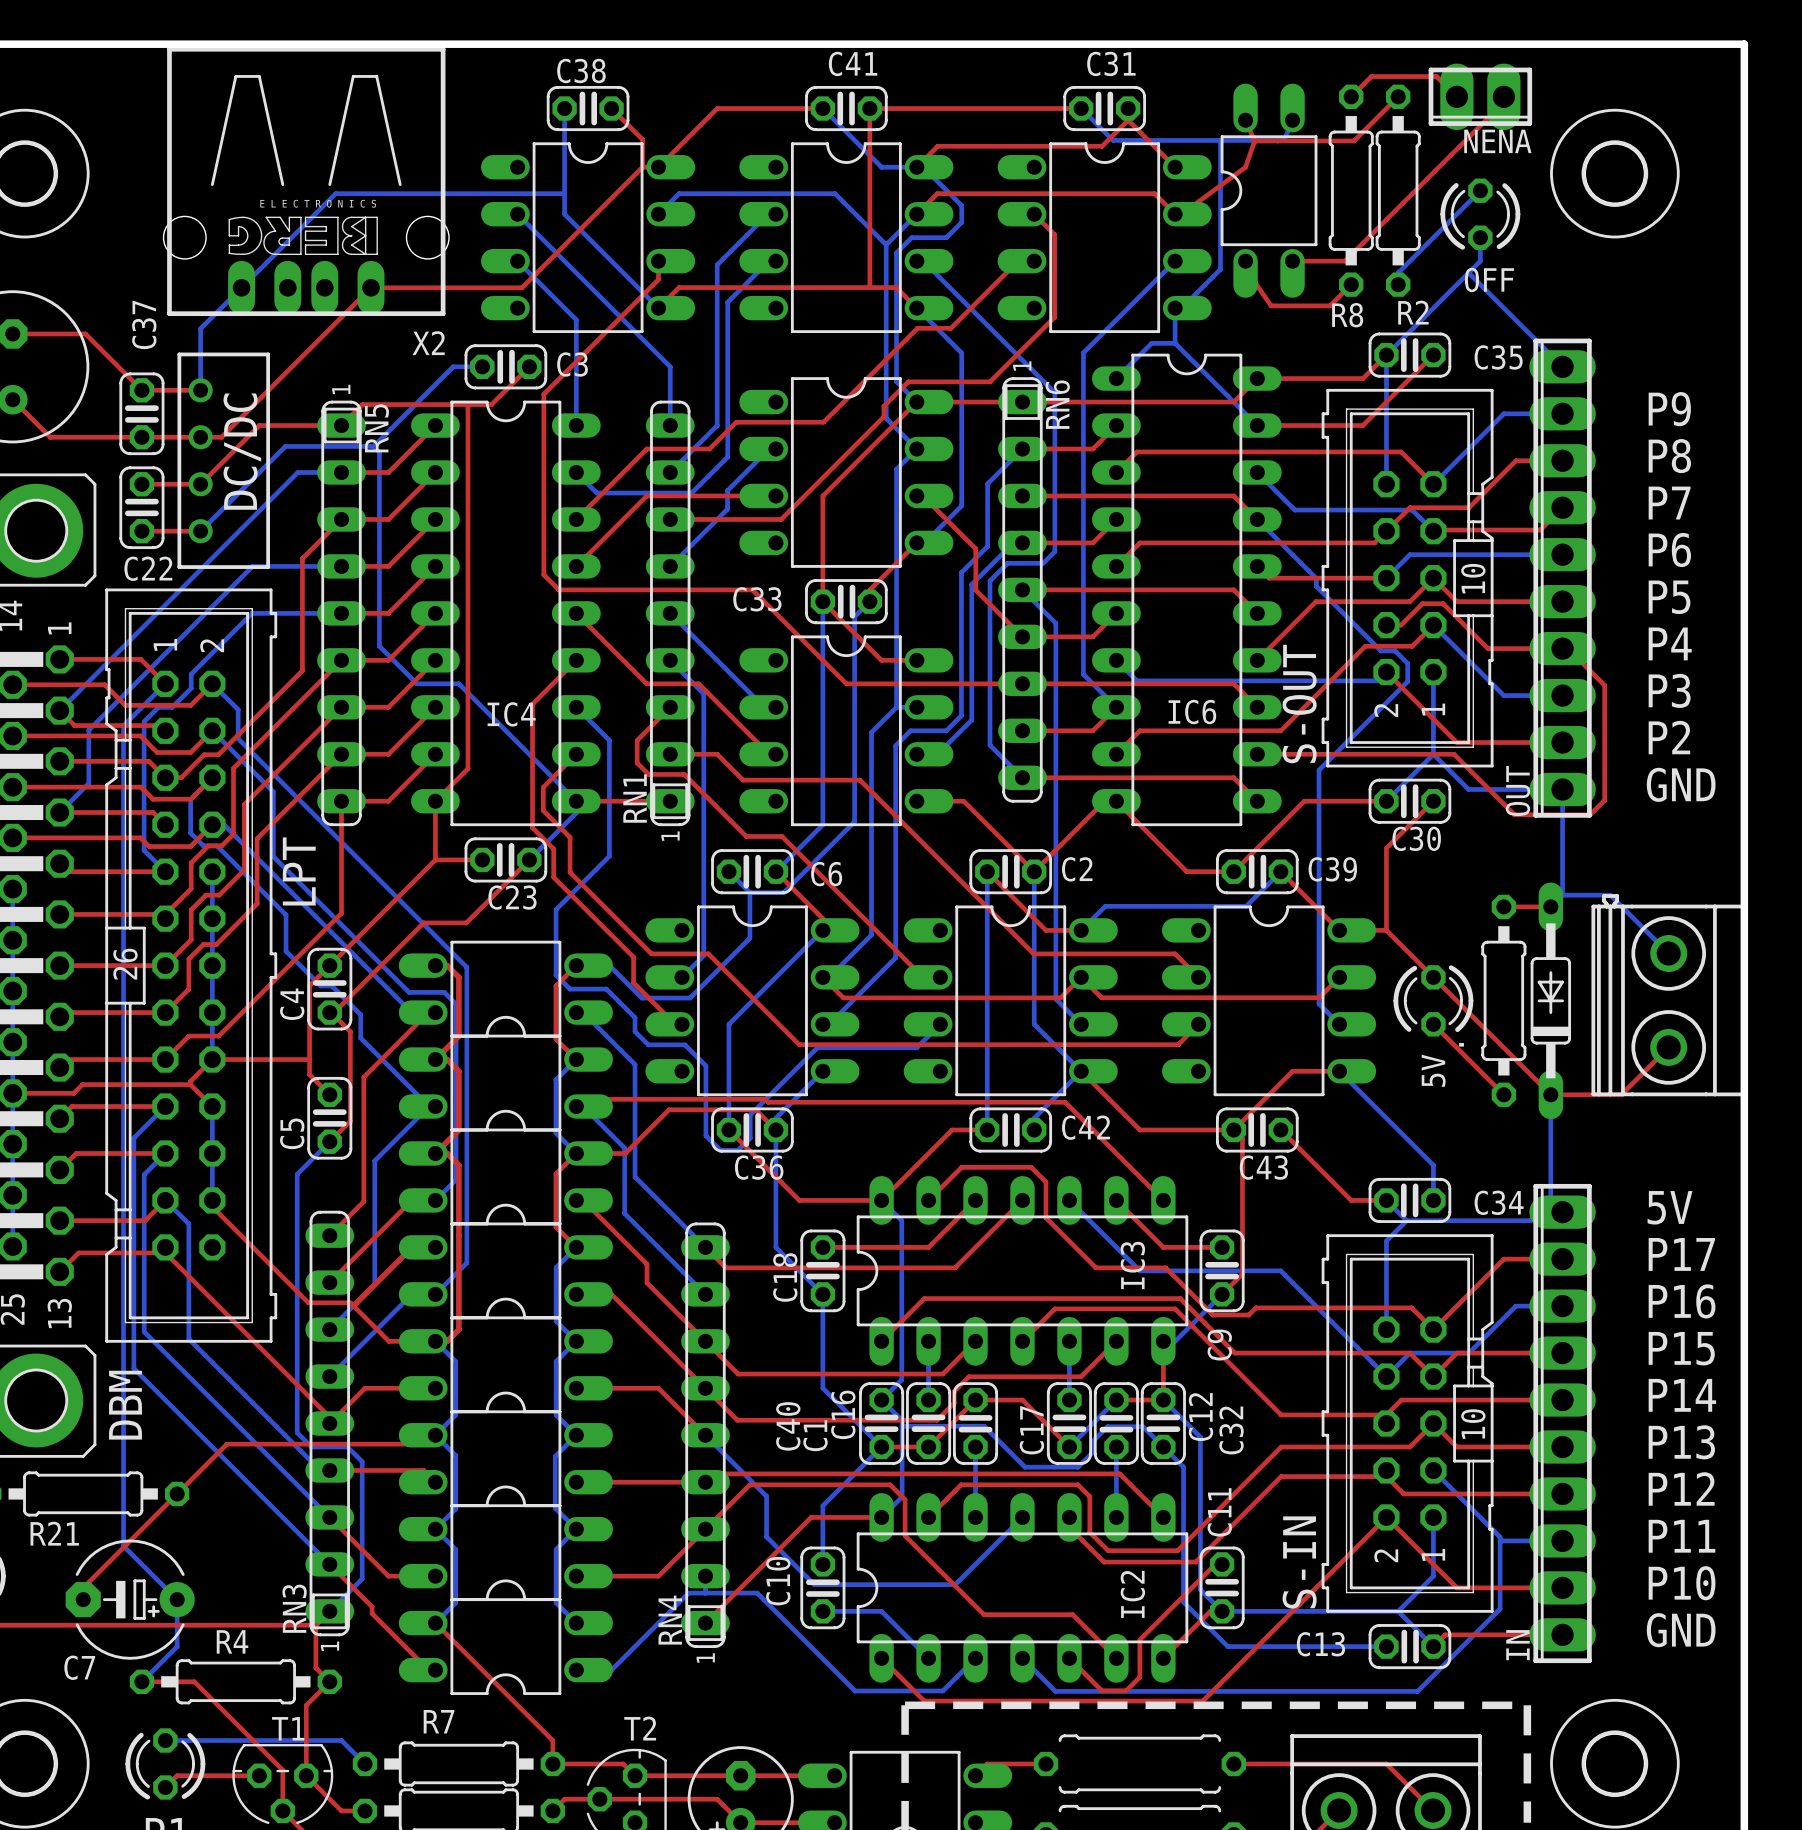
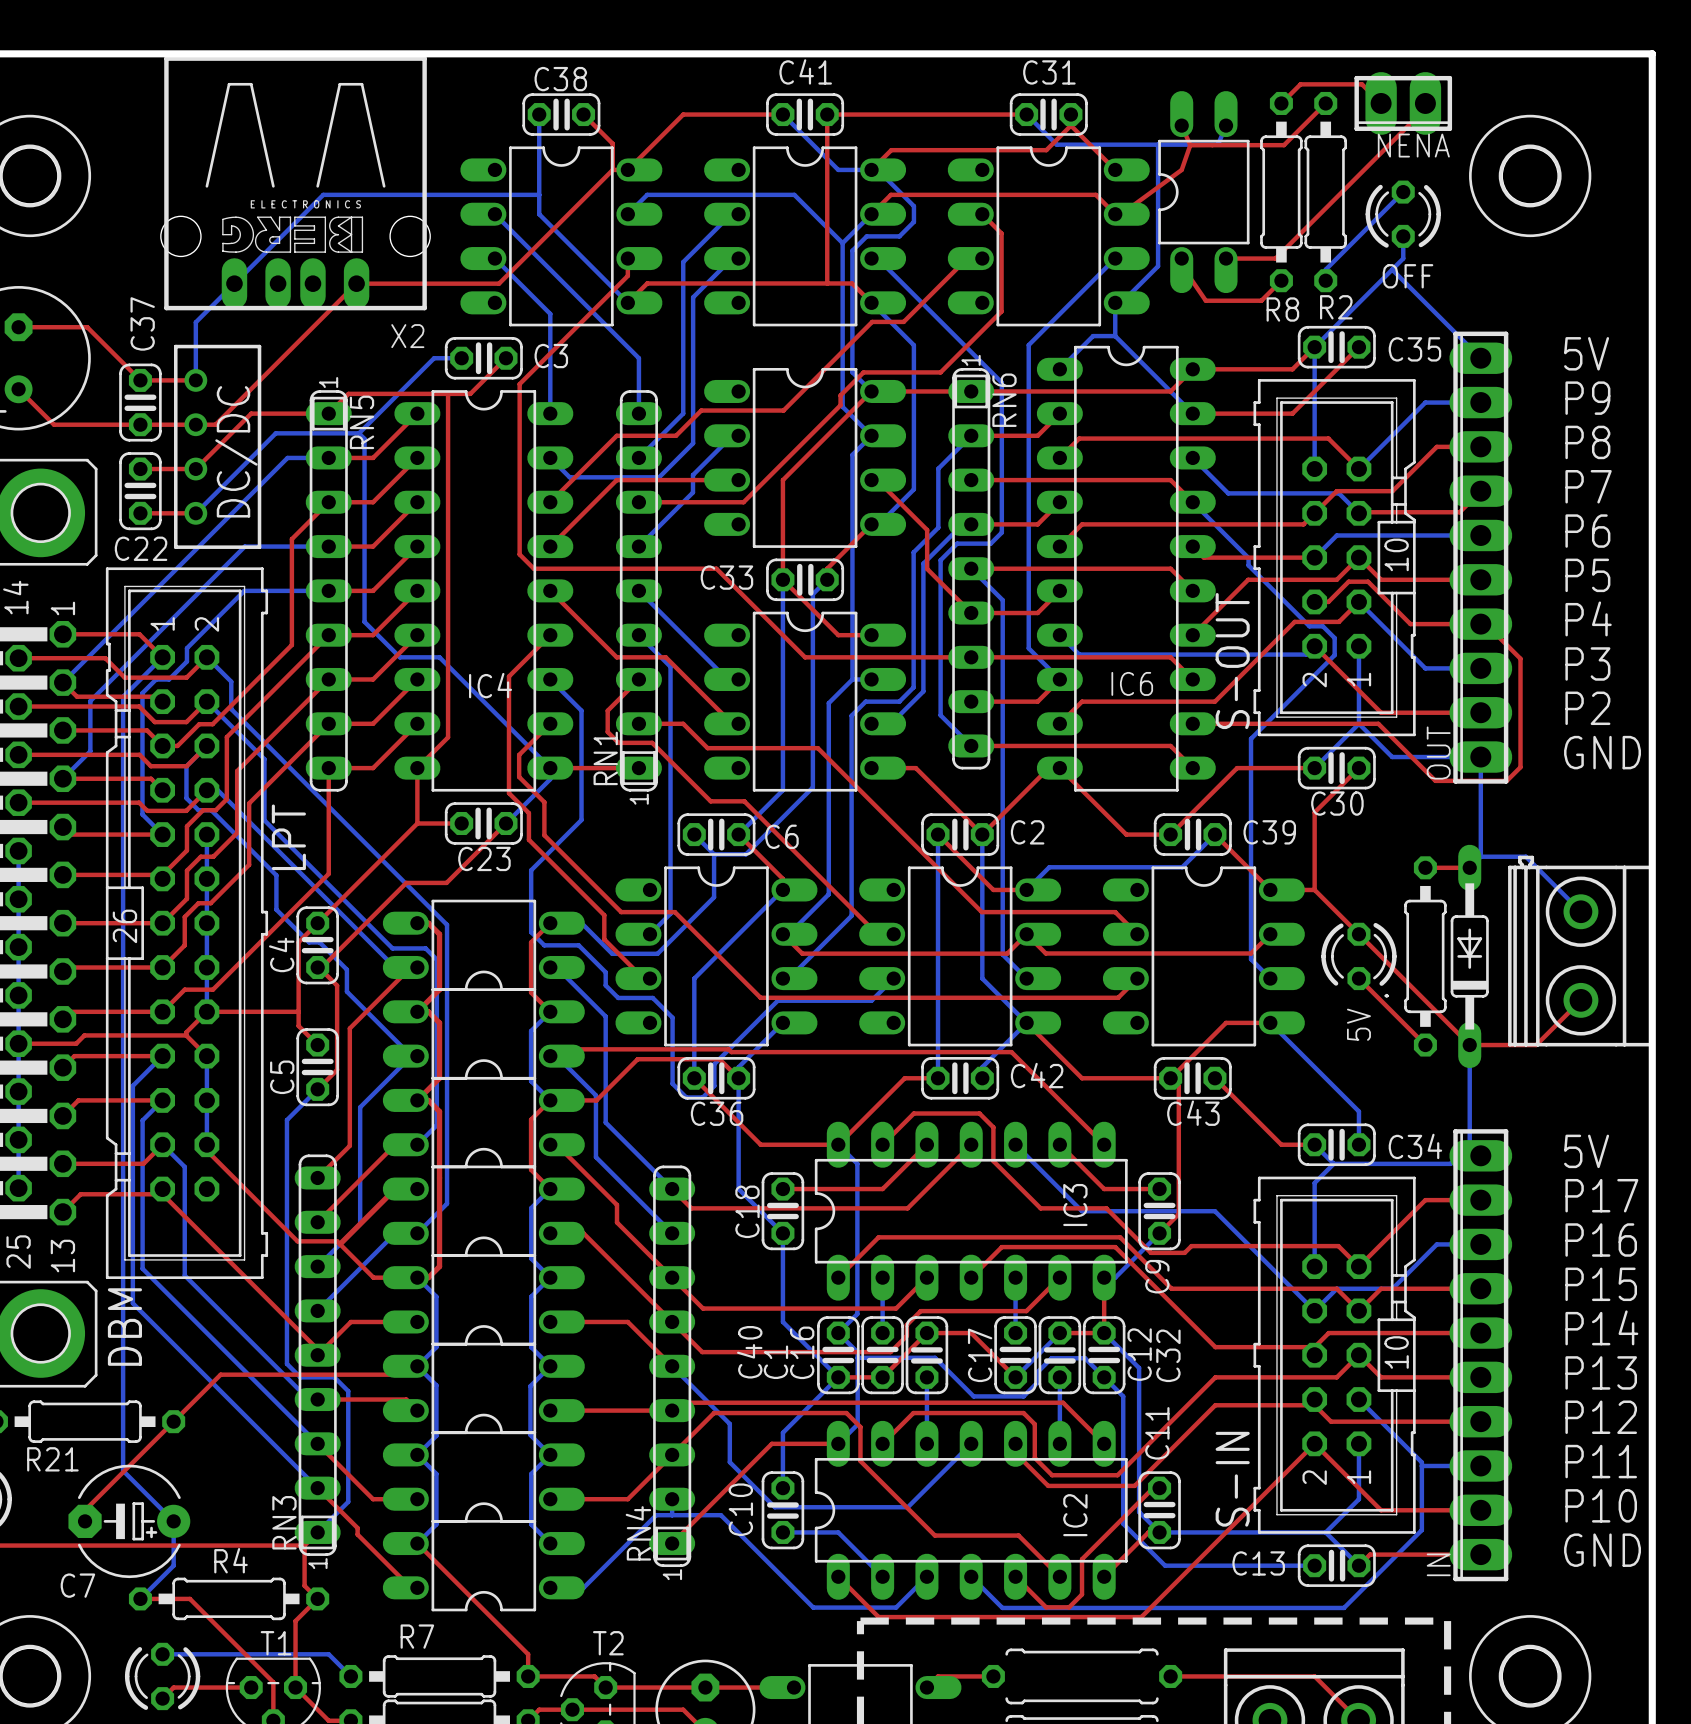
text: none -> 5V (1586, 353)

